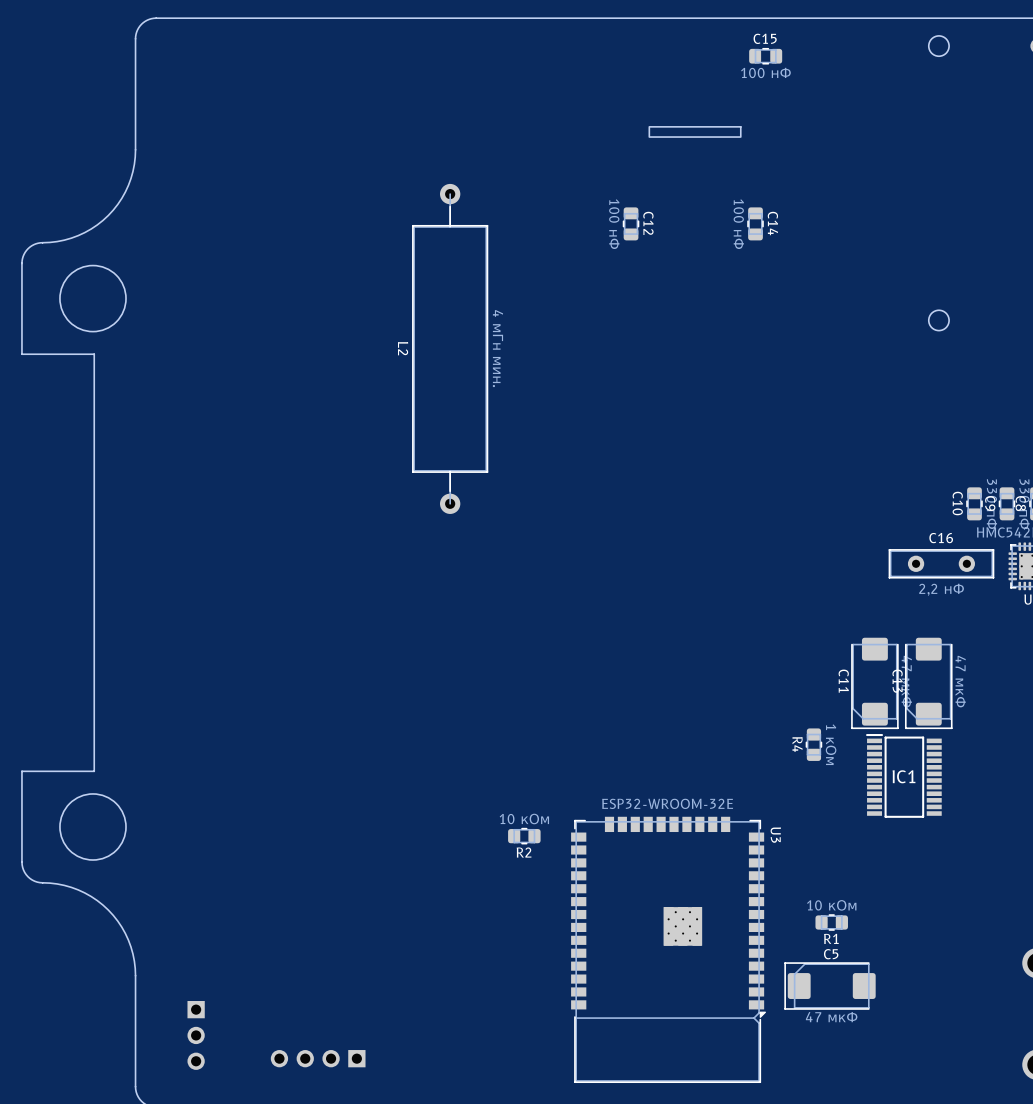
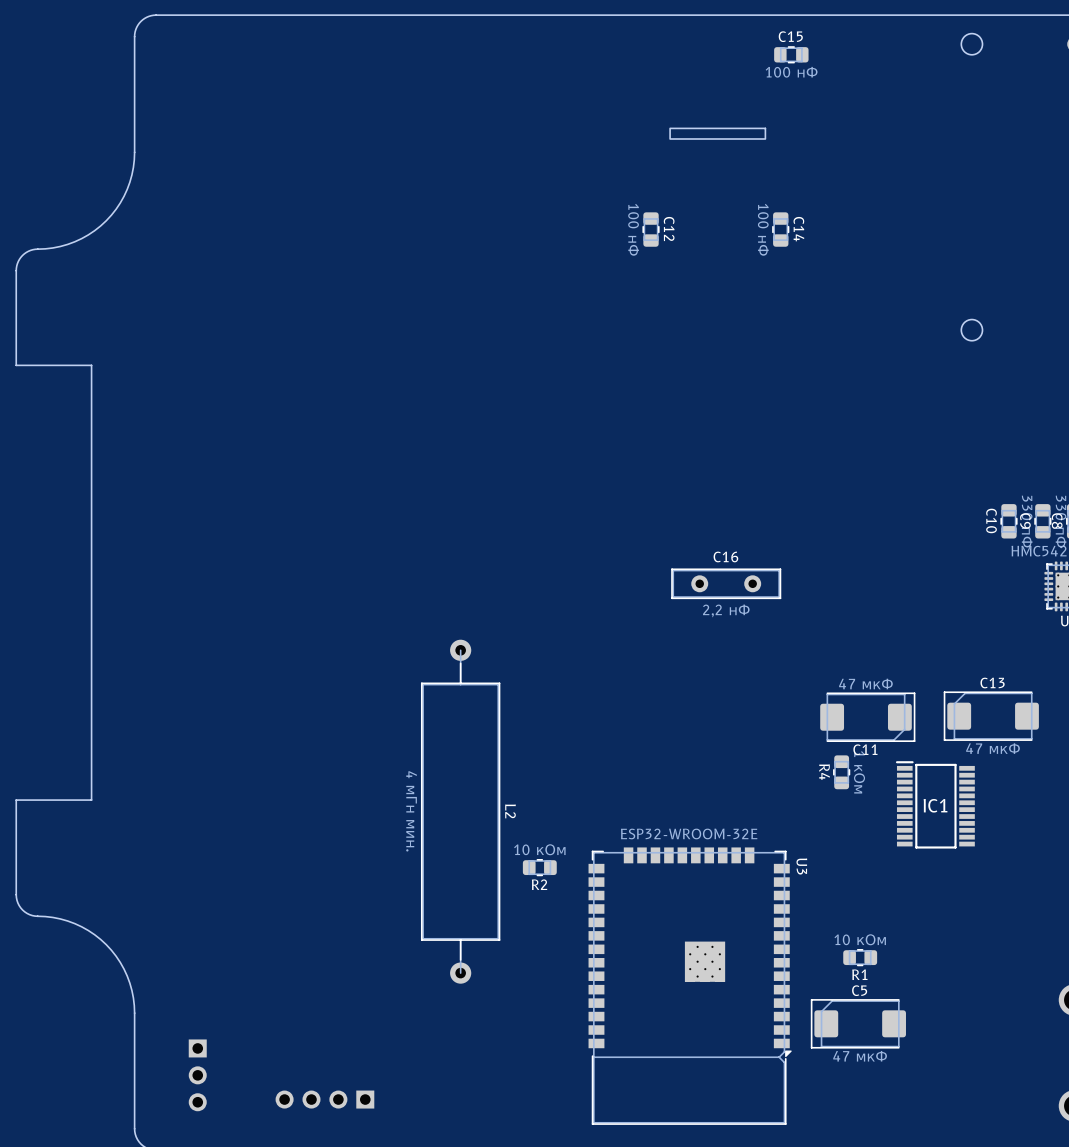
round board edge: [59, 265, 127, 332] -> none
L2 name position: L2 (403, 348) -> L2 (510, 811)
L2 position: (450, 348) -> (460, 811)
L2 value position: 4 мГн мин. (497, 348) -> 4 мГн мин. (411, 811)
C16 position: (941, 563) -> (726, 583)
C11 rotation: 0° (874, 683) -> 90° counterclockwise (867, 717)
C13 rotation: 0° (928, 683) -> 90° clockwise (991, 716)
round board edge: [59, 793, 127, 861] -> none

